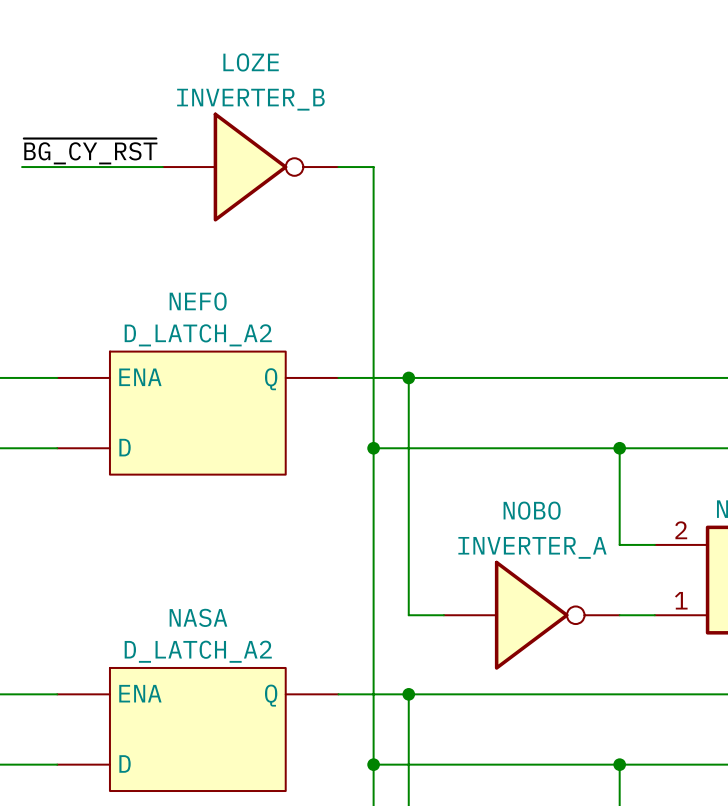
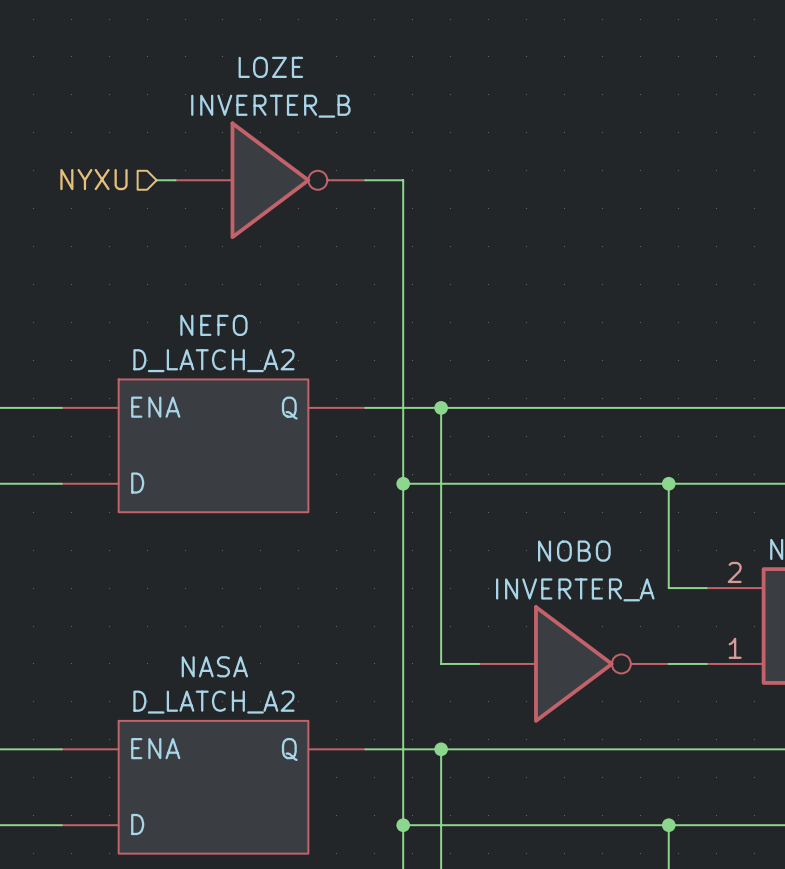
label: ~{BG_CY_RST} (90, 151) -> none
hierarchical label: none -> NYXU (93, 179)
wire: (22, 167) (145, 167) -> none

